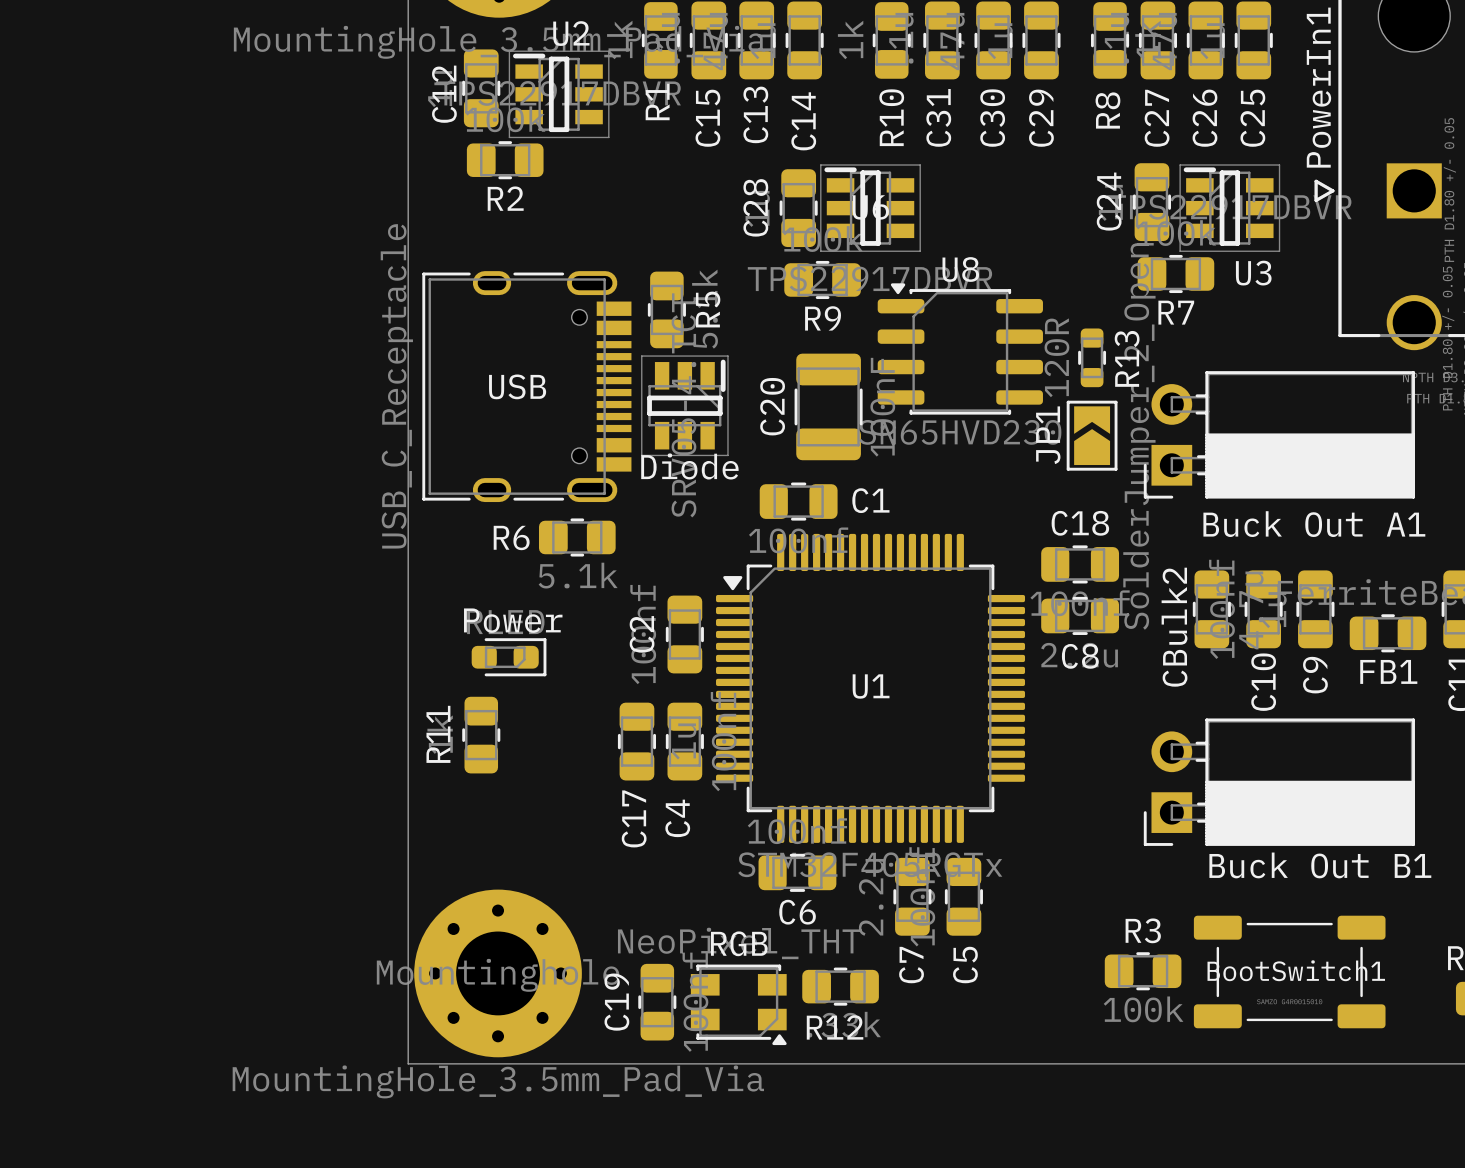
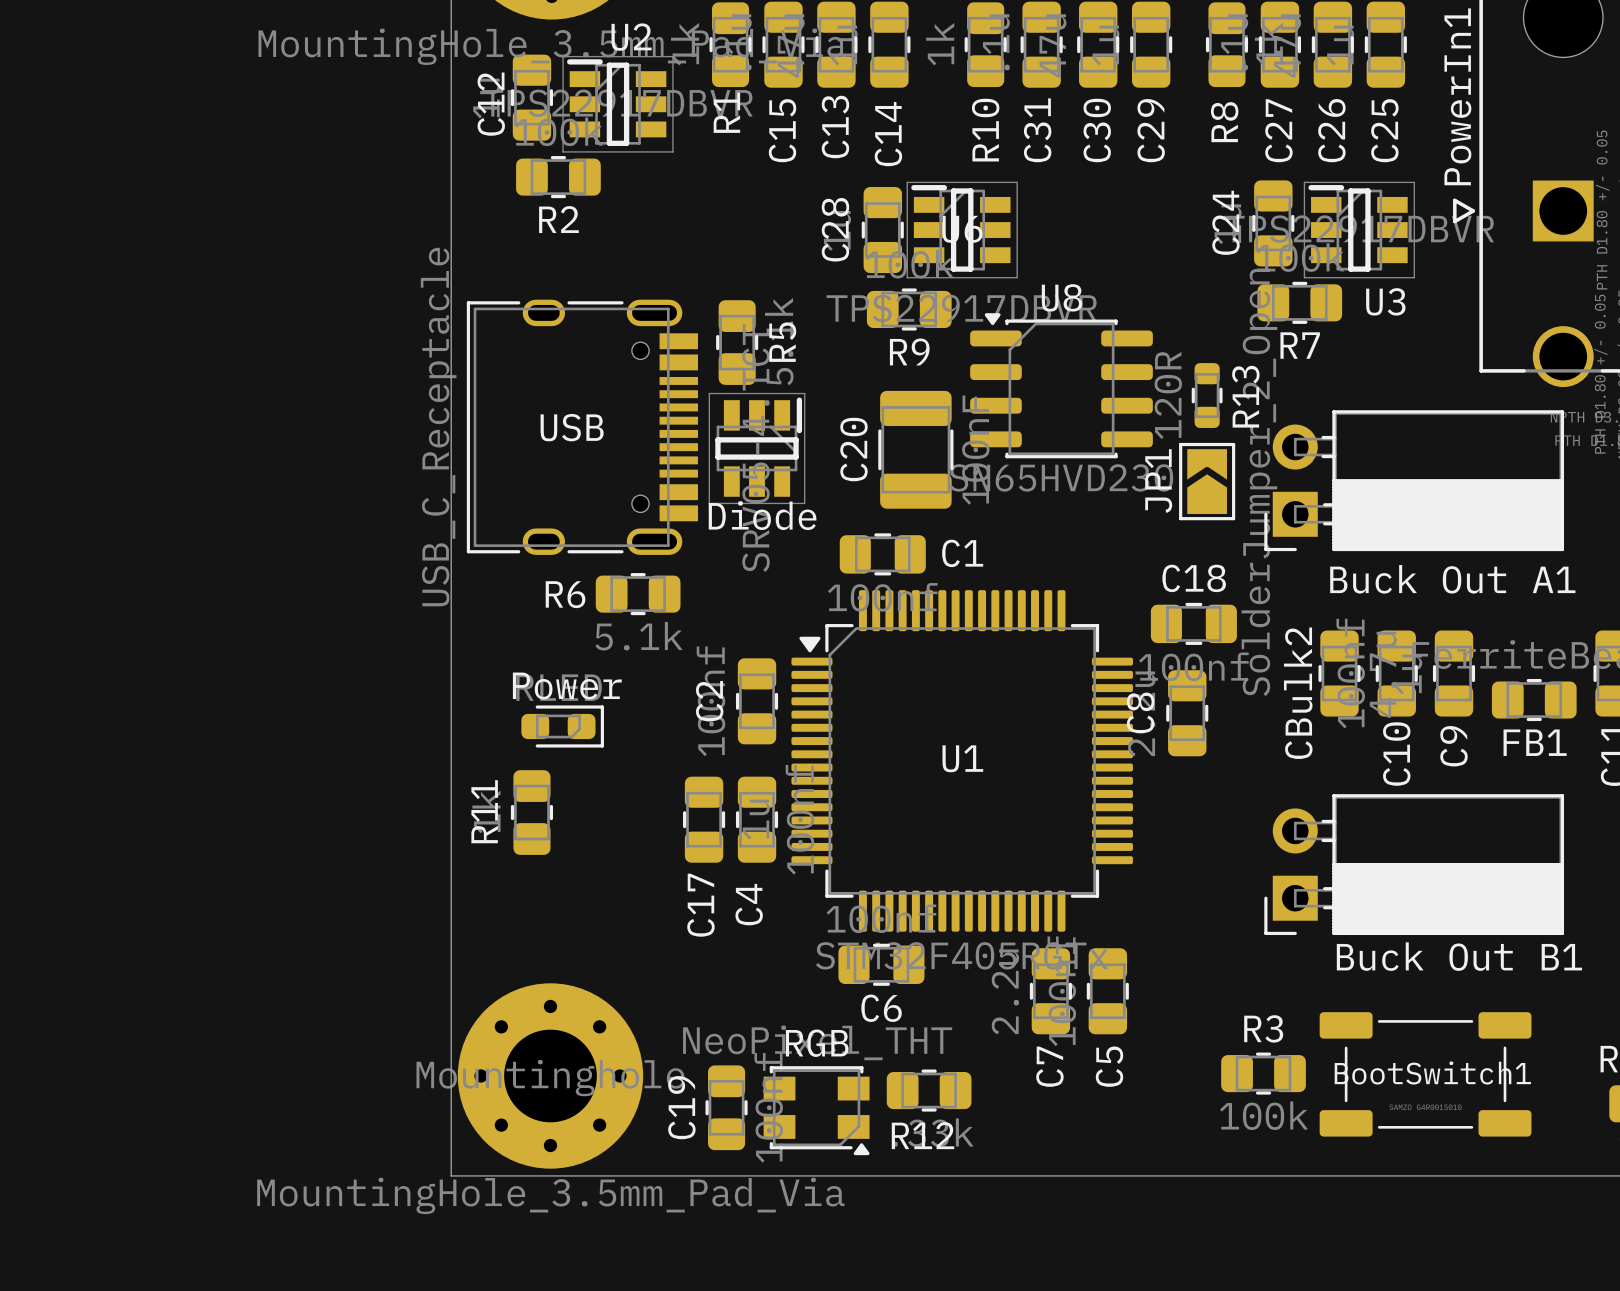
C8 rotation: 0° (1080, 615) -> 90° clockwise (1187, 713)
C7 position: (912, 896) -> (1050, 991)
C5 position: (963, 896) -> (1107, 991)

